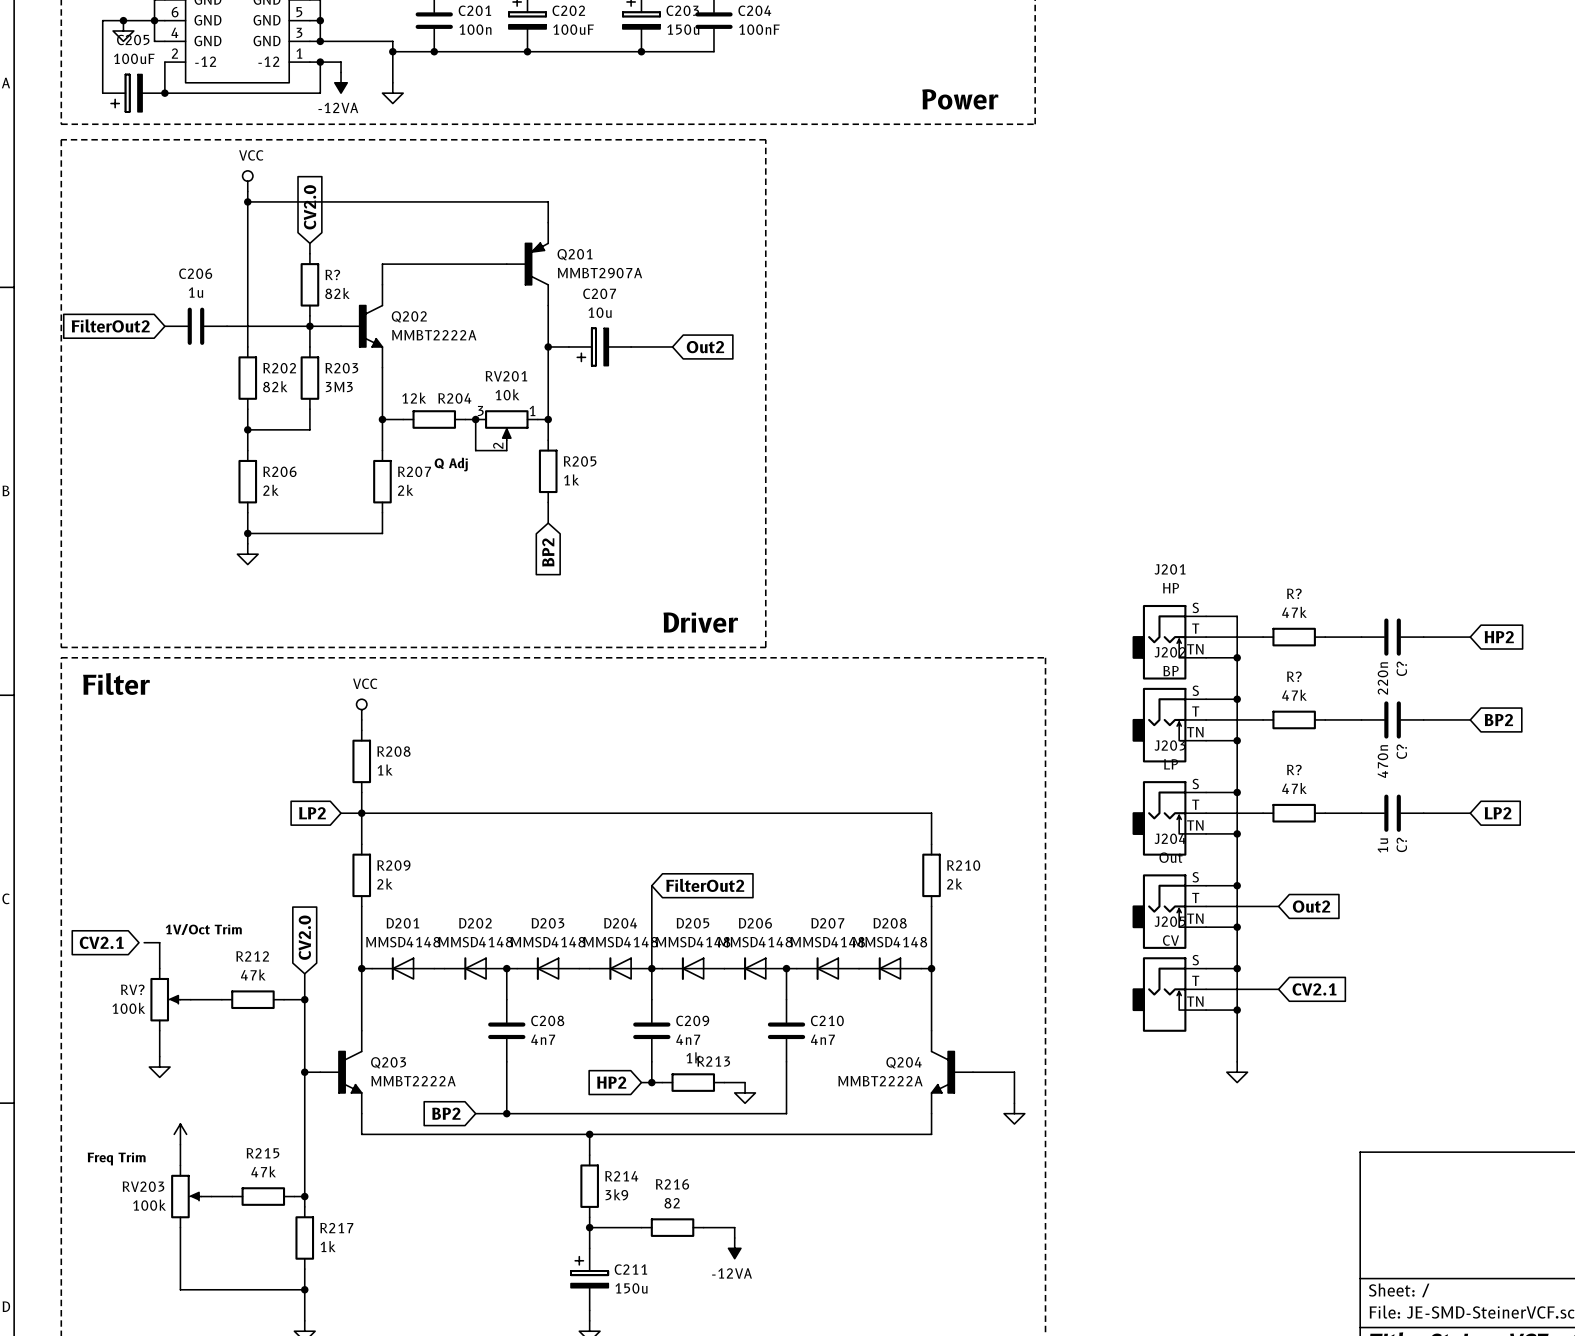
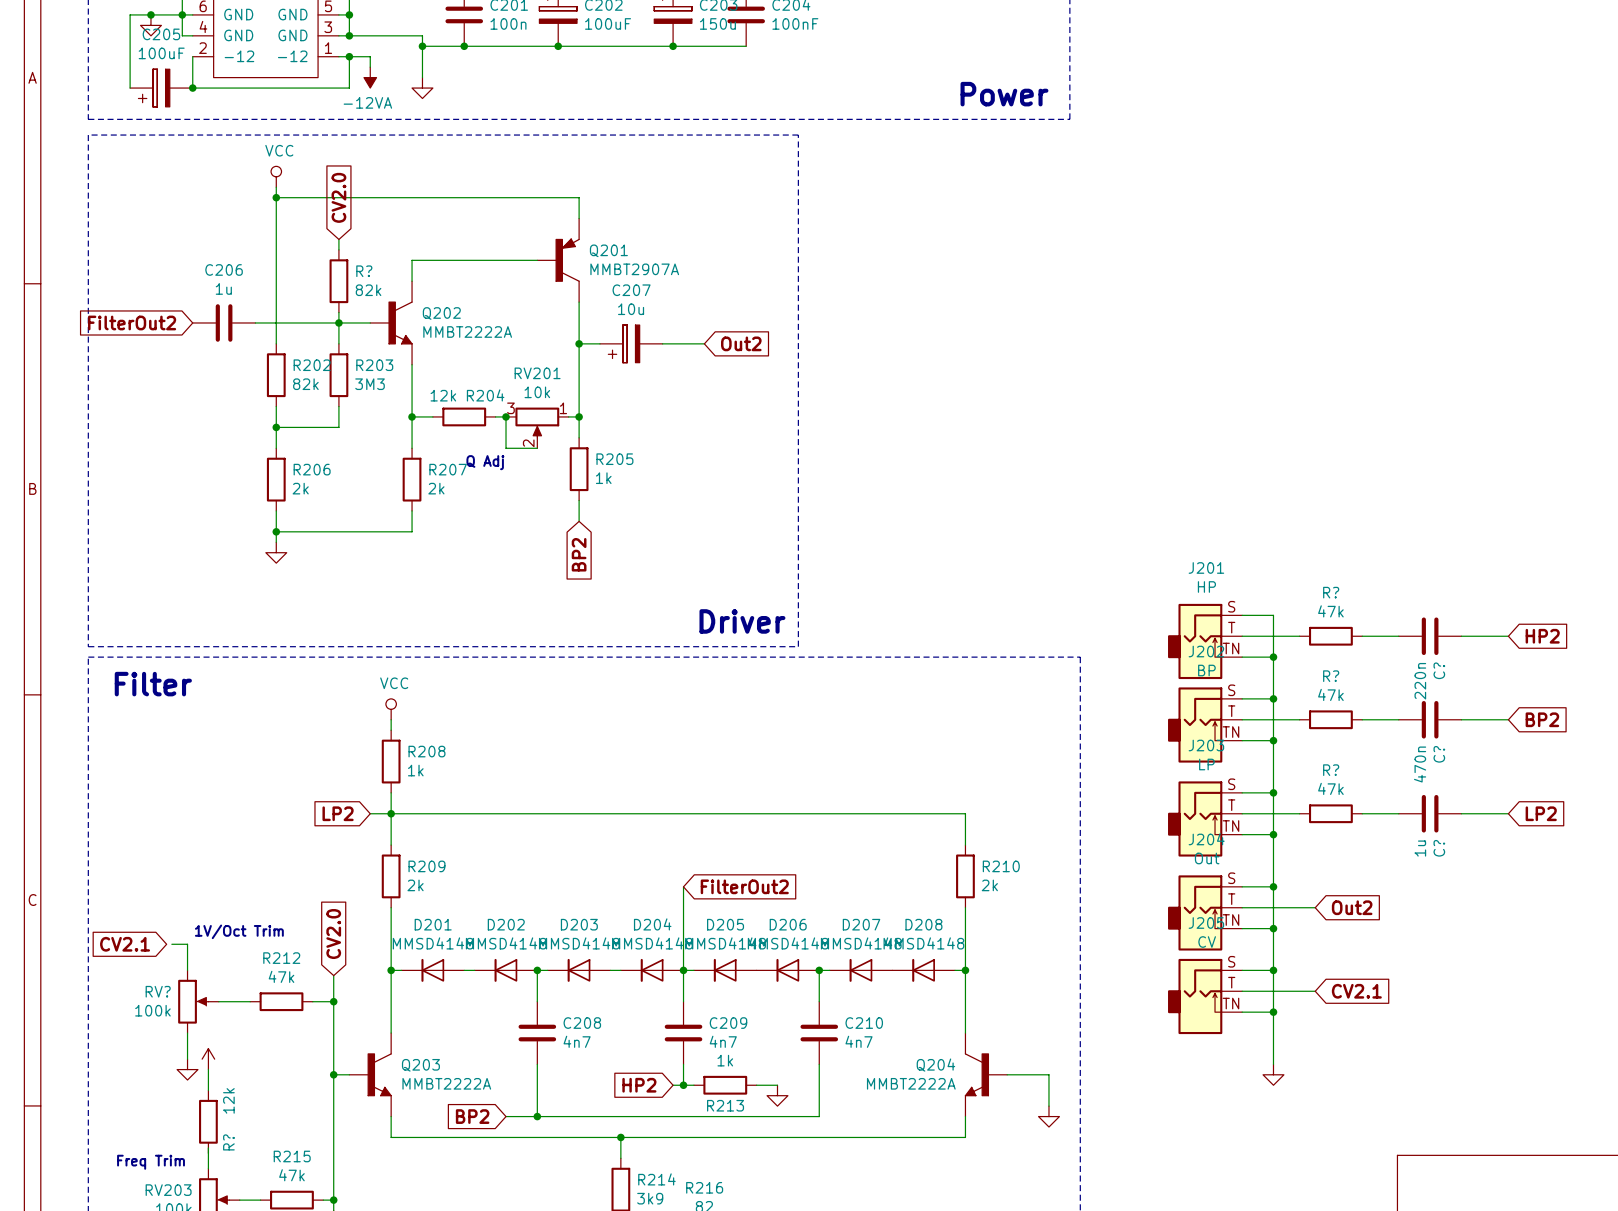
R213 name position: R213 (713, 1061) -> R213 (725, 1105)
wire: none -> (208, 1069) (208, 1090)
R?: none -> 12k (208, 1121)
power symbol position: (180, 1134) -> (208, 1059)

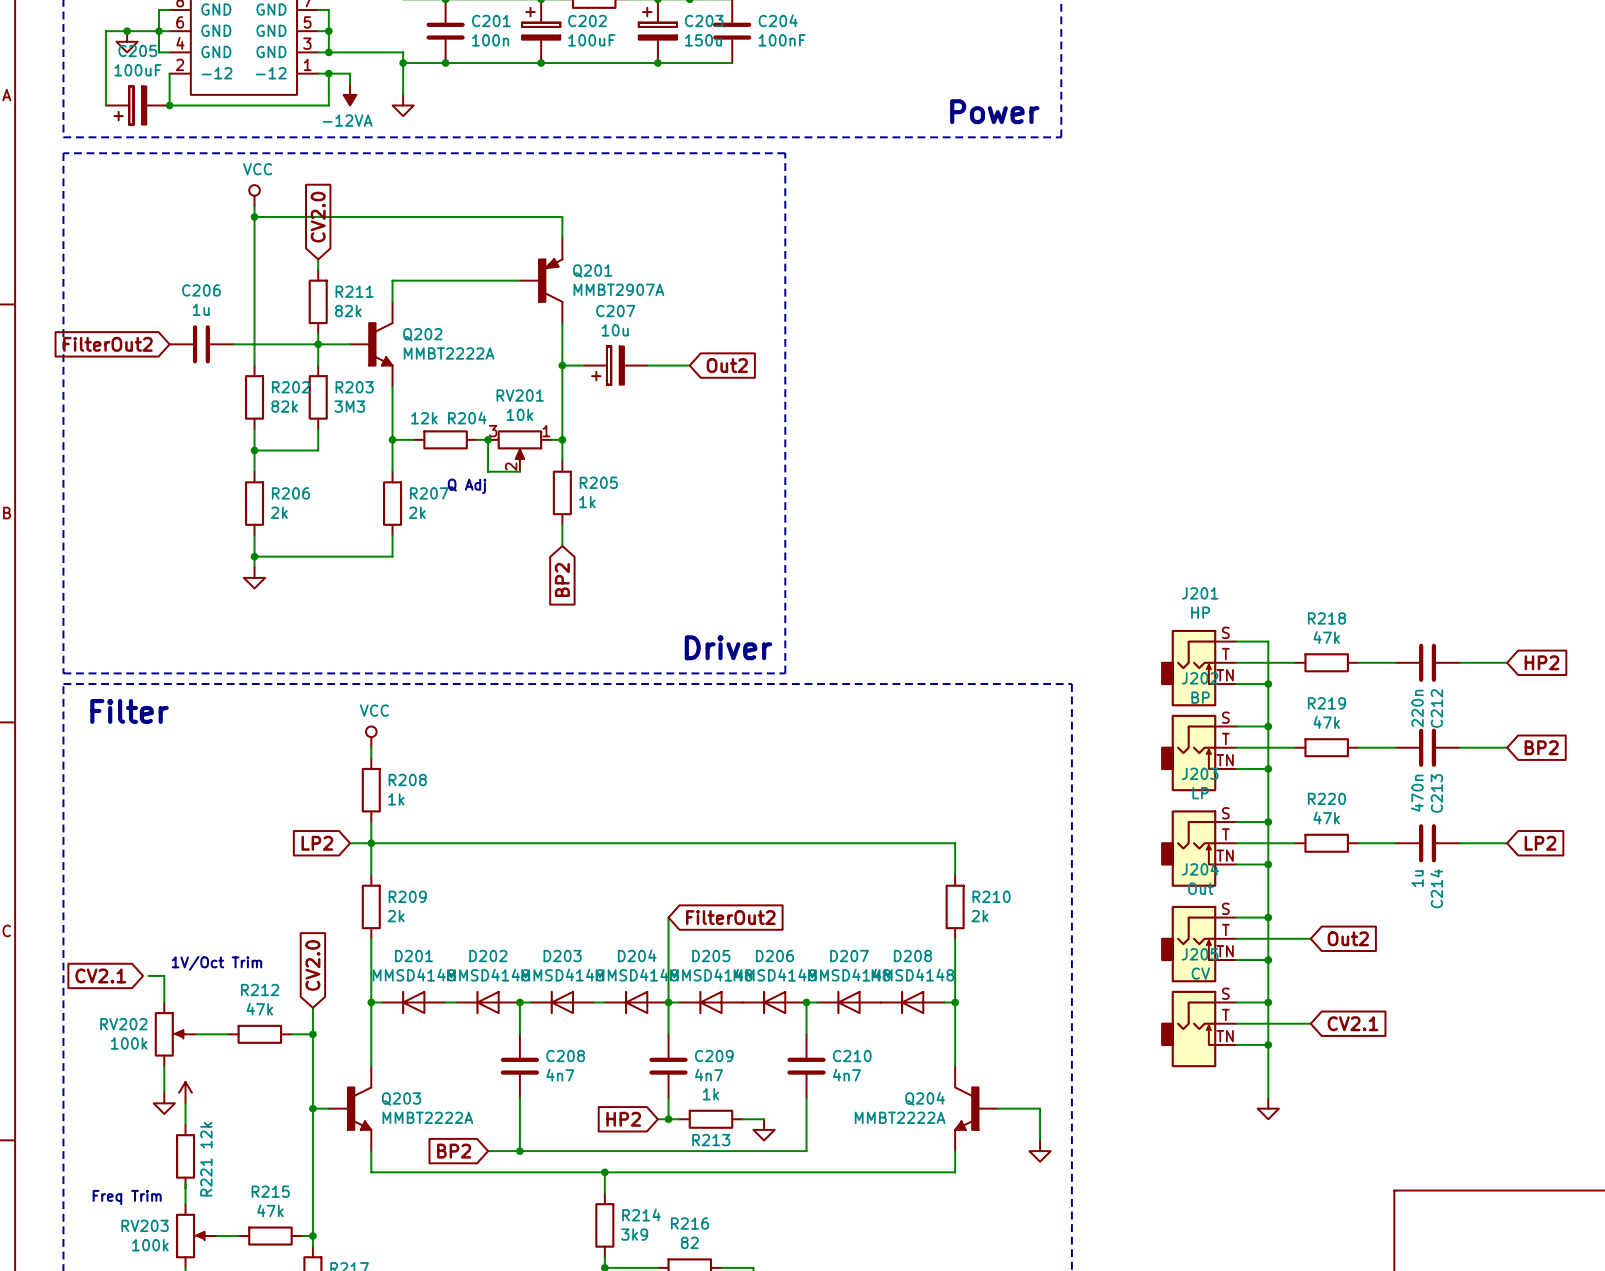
R? name: R? (364, 271) -> R211 (354, 291)
R? name: R? (1331, 592) -> R218 (1326, 618)
C? name: C? (1439, 670) -> C212 (1436, 708)
R? name: R? (1331, 676) -> R219 (1326, 703)
C? name: C? (1439, 754) -> C213 (1436, 793)
R? name: R? (1331, 770) -> R220 (1326, 798)
C? name: C? (1439, 848) -> C214 (1436, 888)
RV? name: RV? (158, 991) -> RV202 (123, 1024)
R? name: R? (228, 1142) -> R221 (206, 1177)

